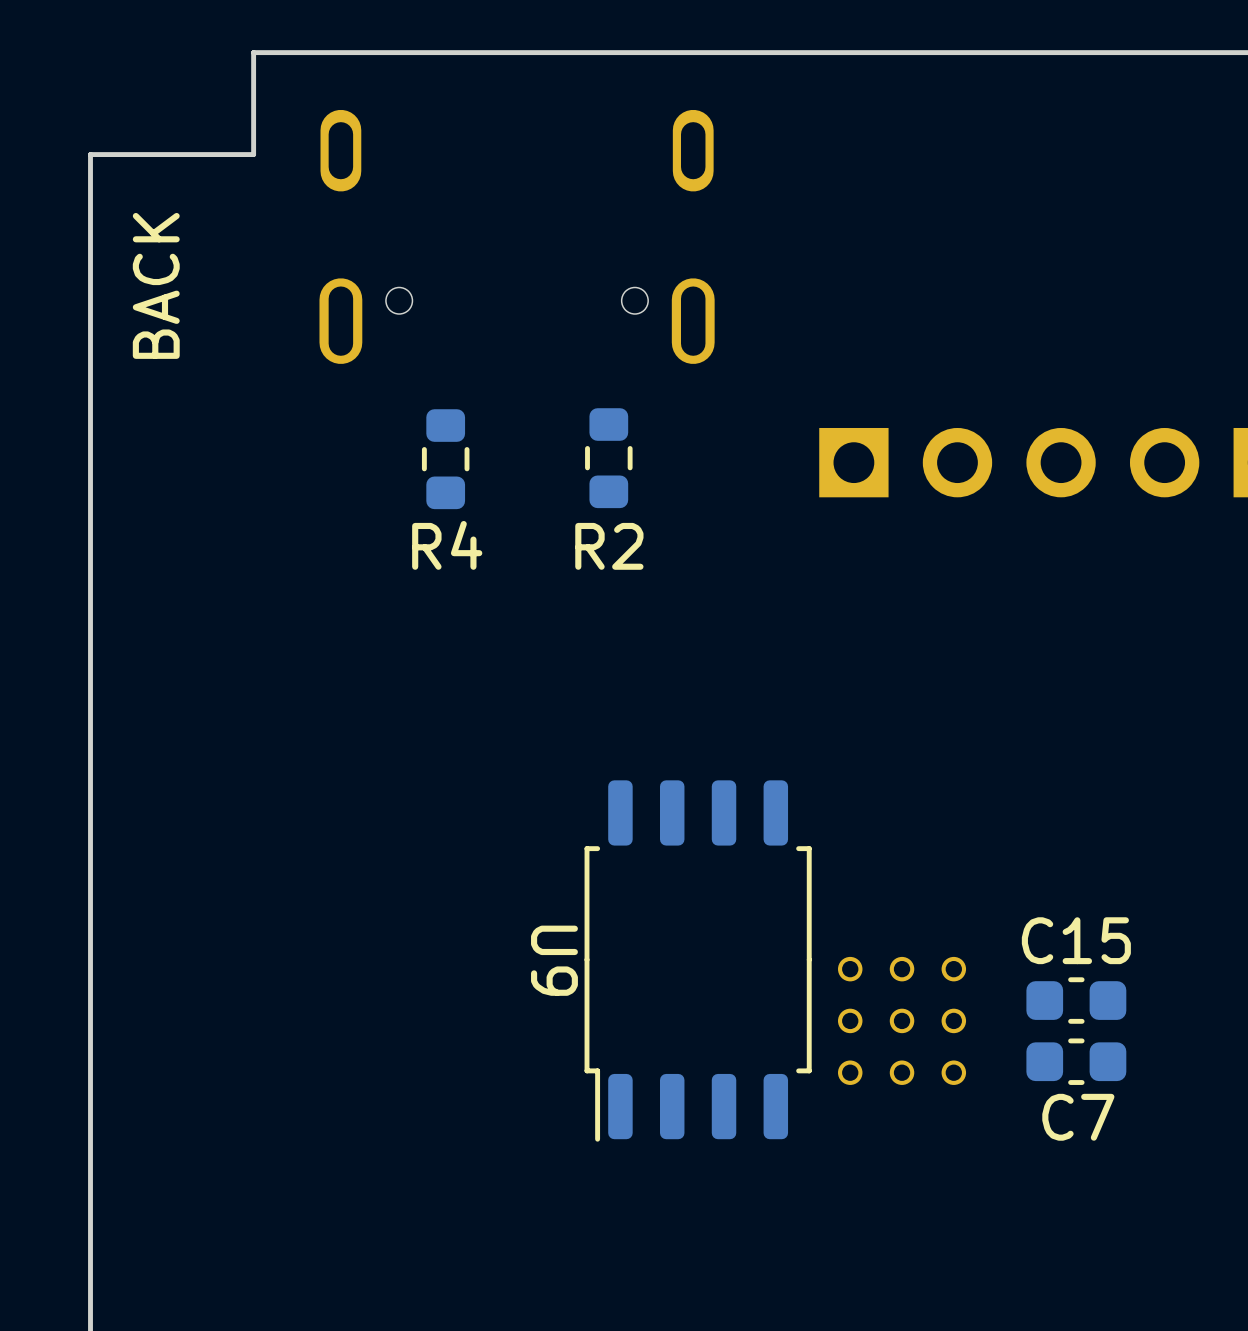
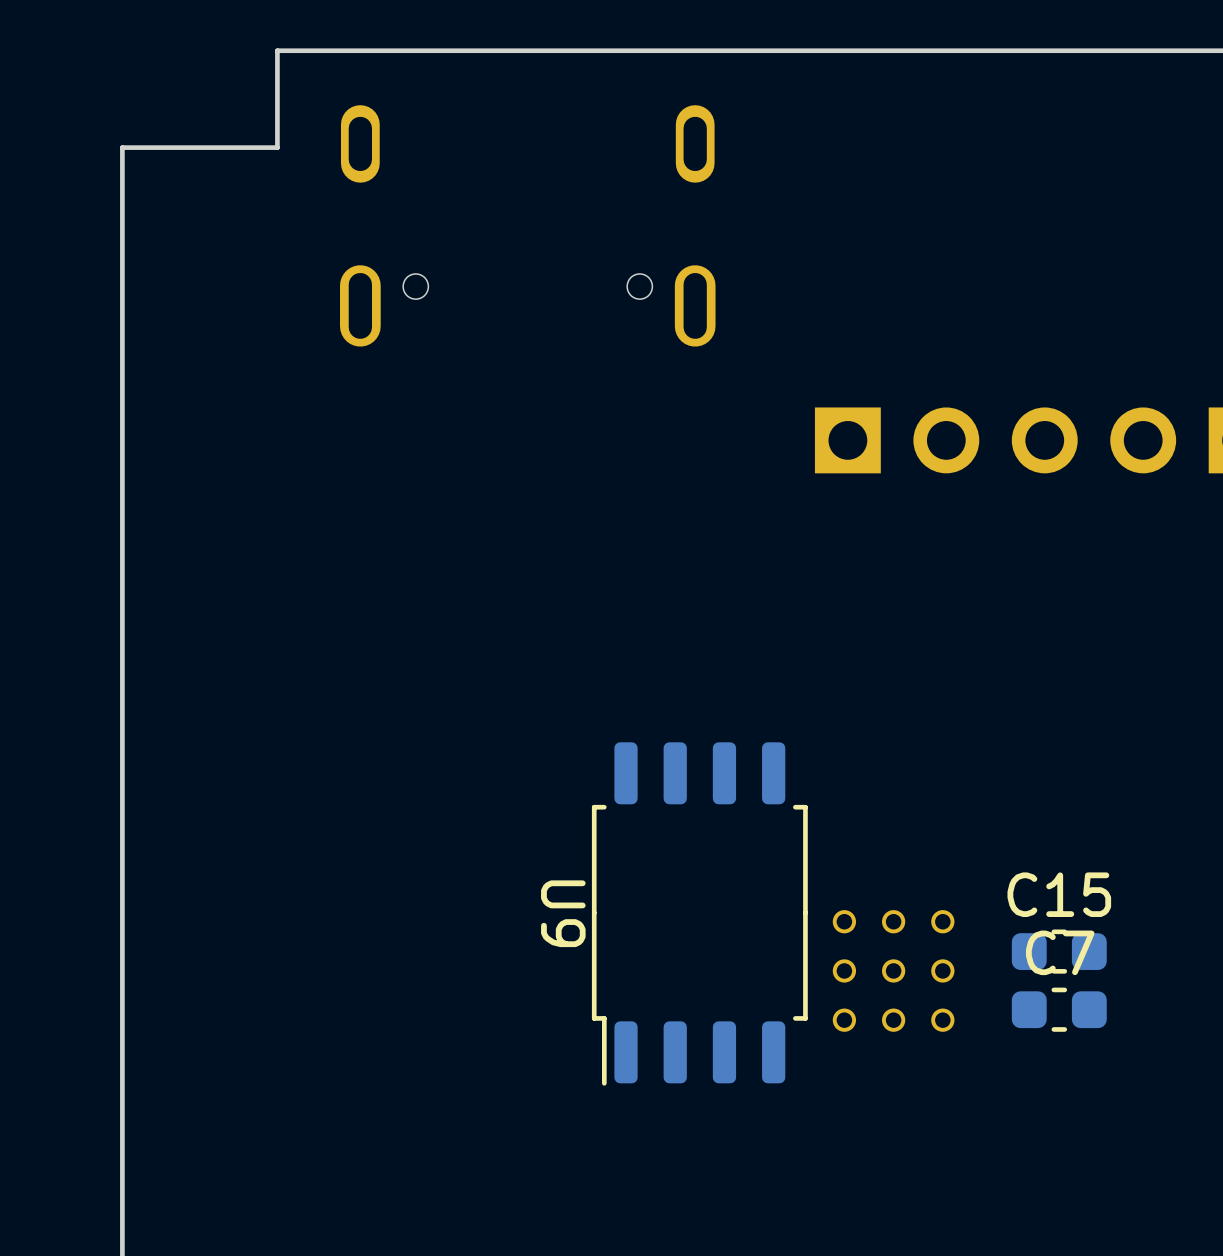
text: BACK (156, 285) -> none
R2: (608, 458) -> none
R4: (445, 459) -> none
C7 name position: C7 (1078, 1117) -> C7 (1060, 952)

